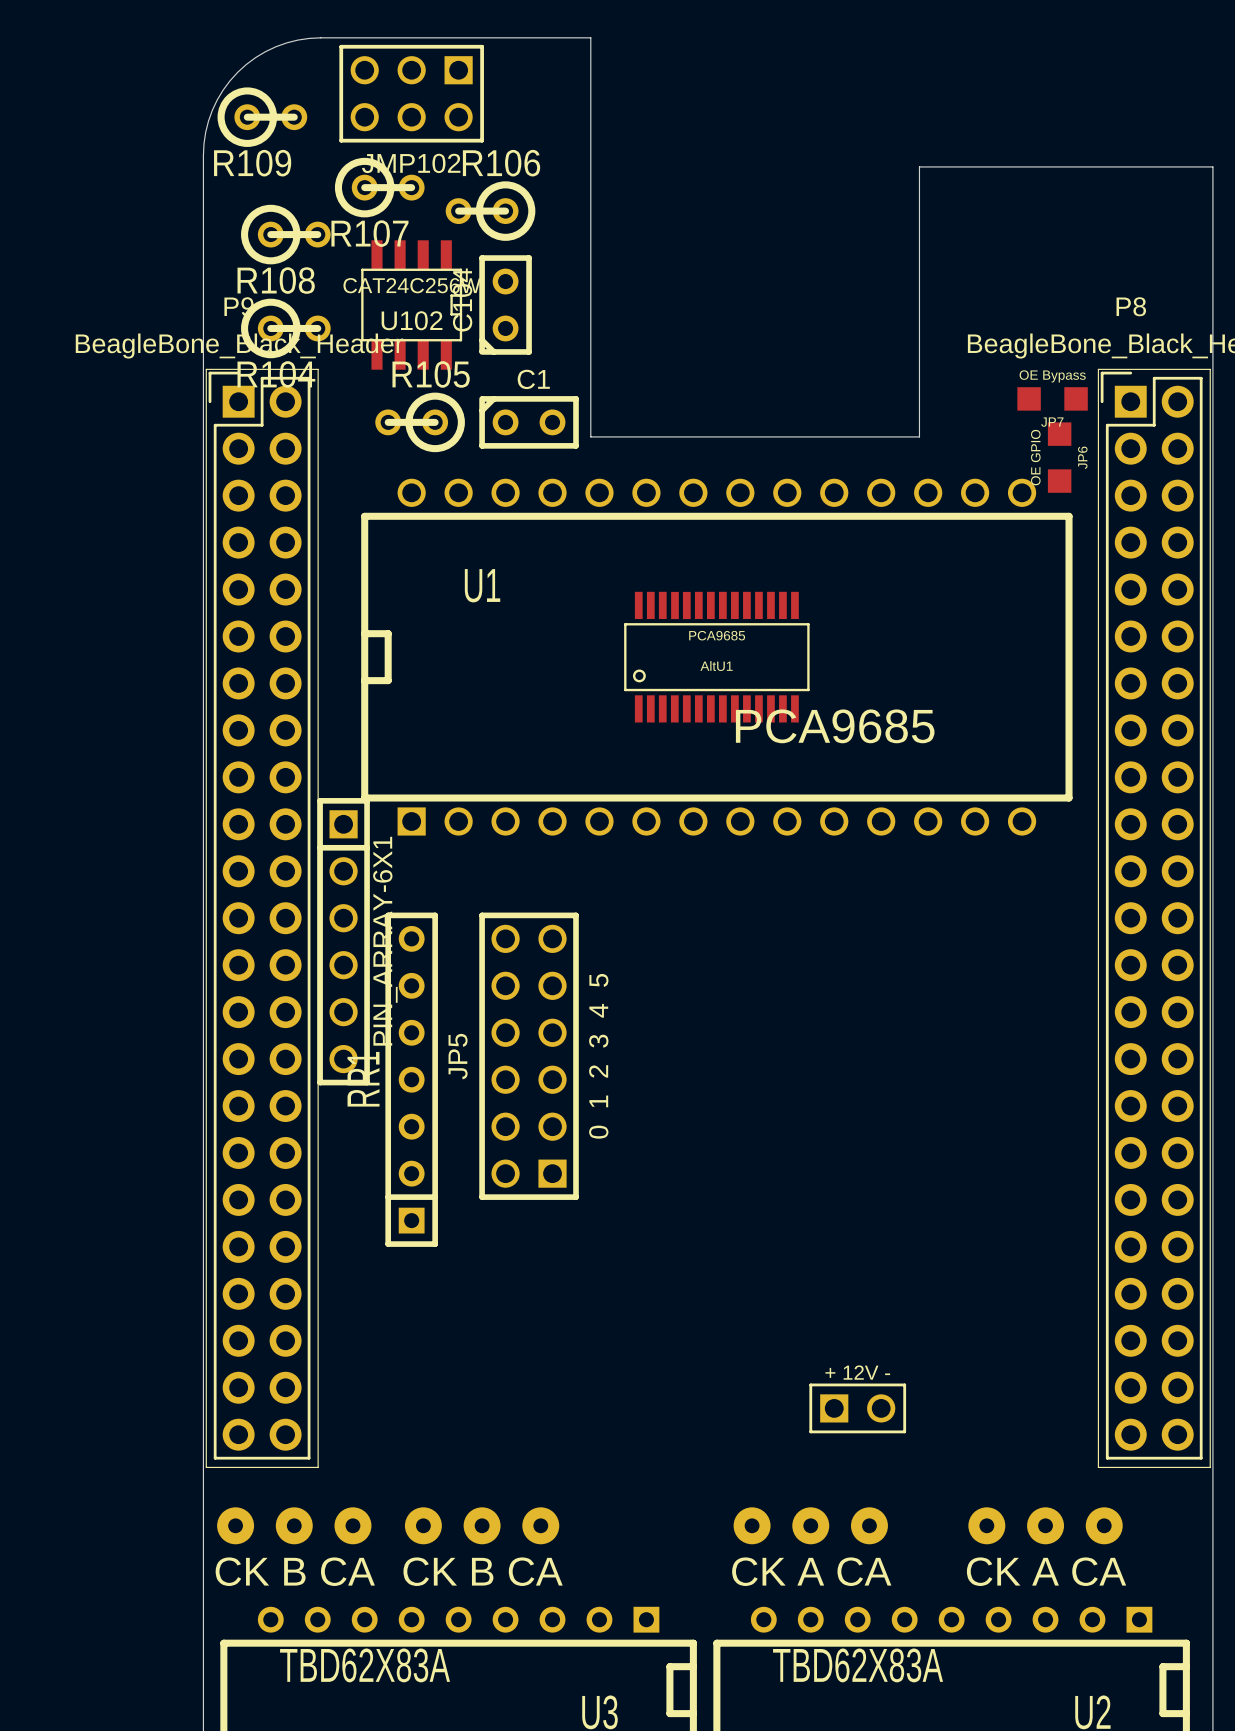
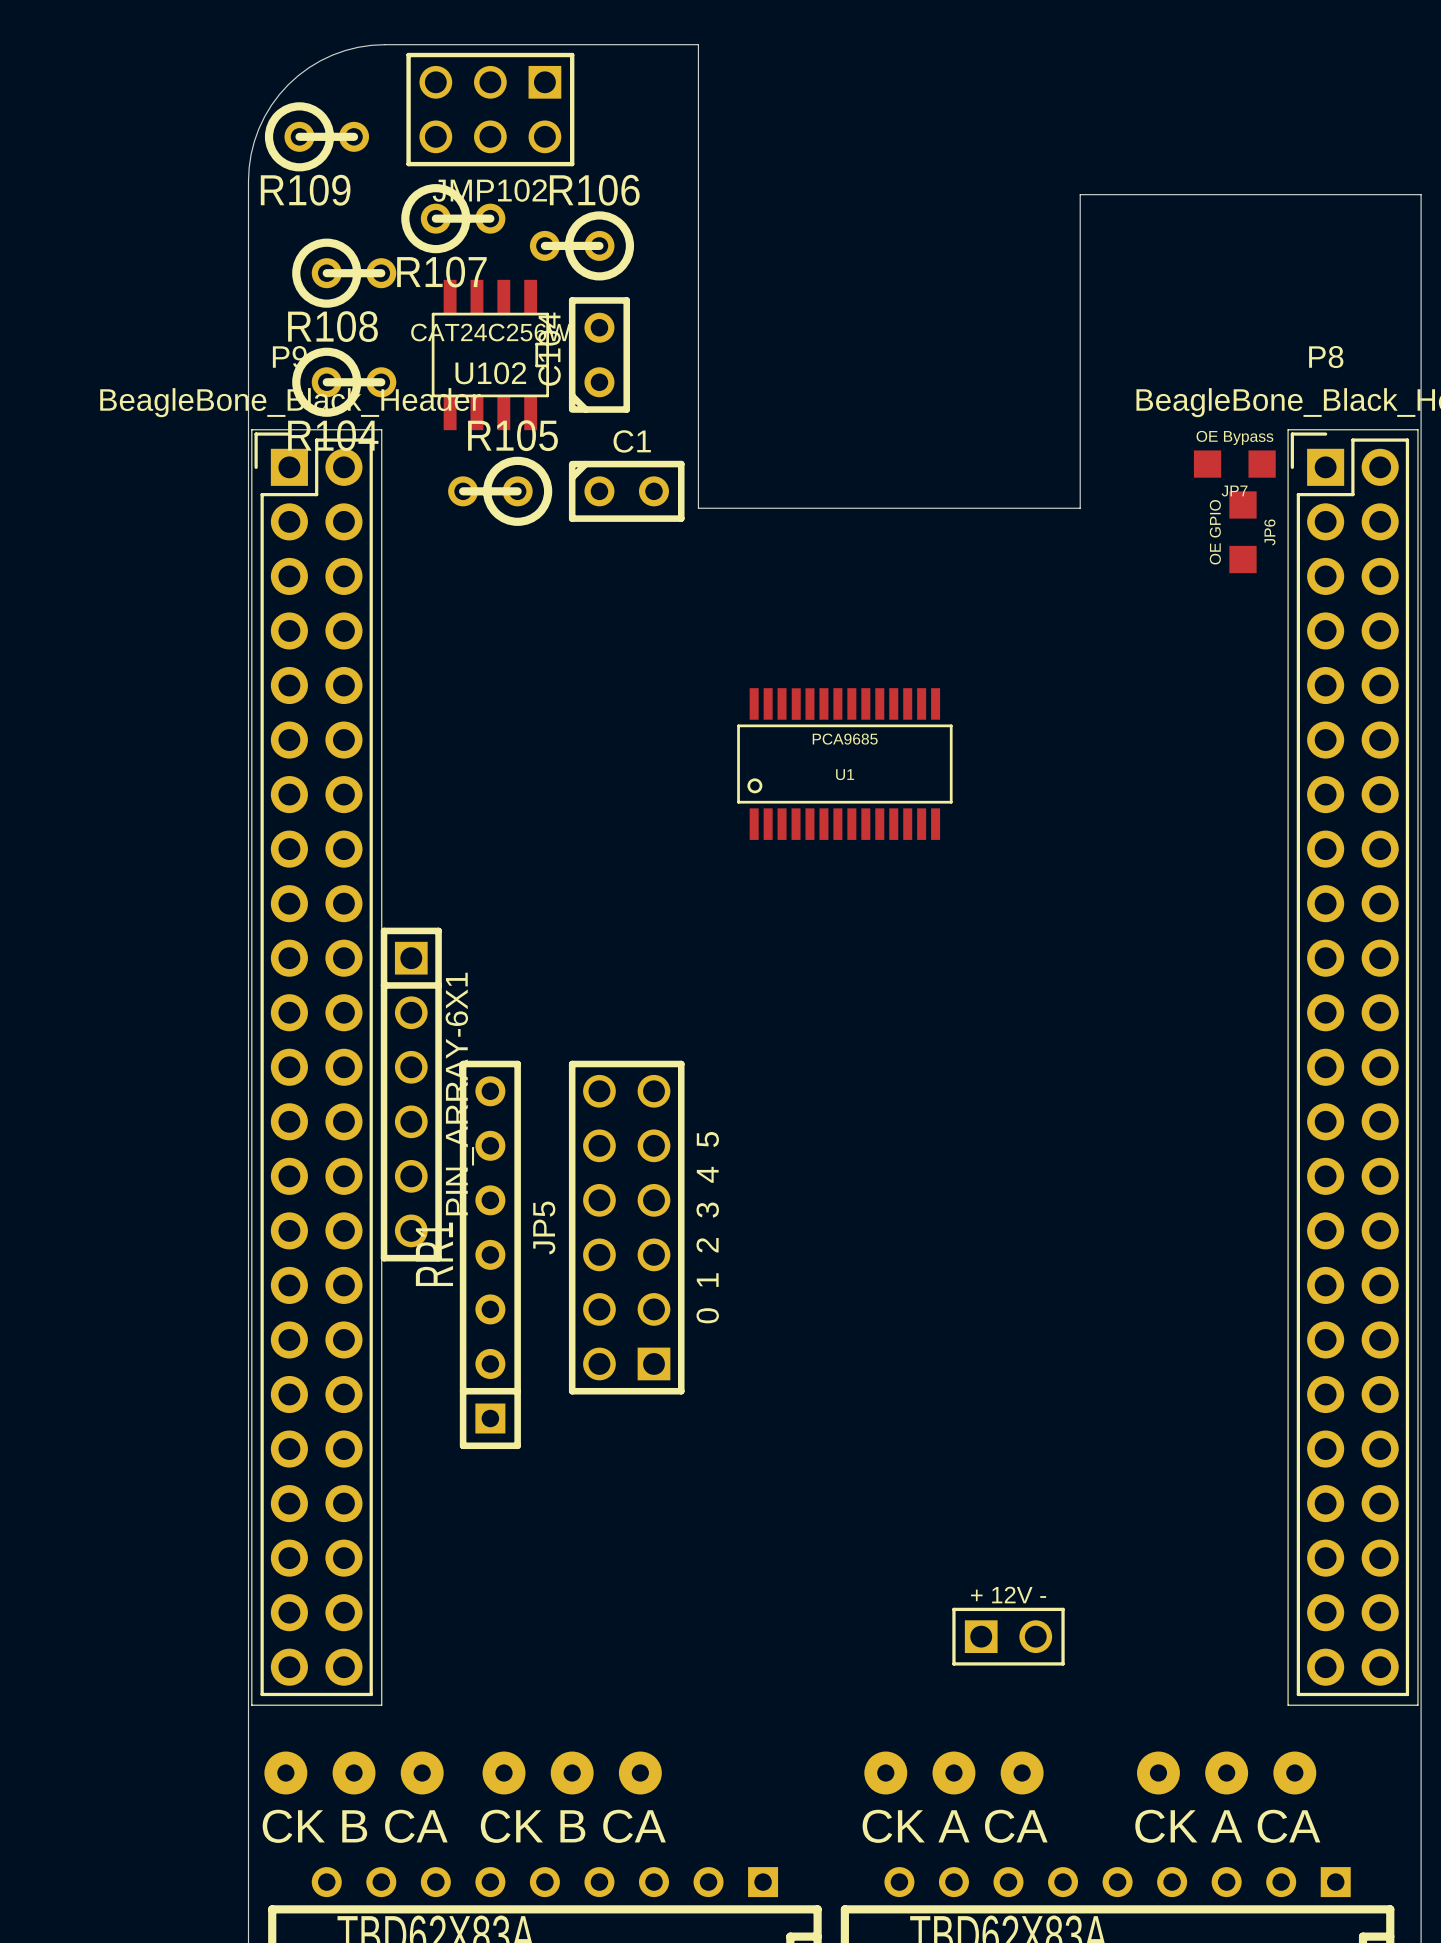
U1: PCA9685 (716, 657) -> none
AltU1 name: AltU1 (716, 666) -> U1 (845, 774)

